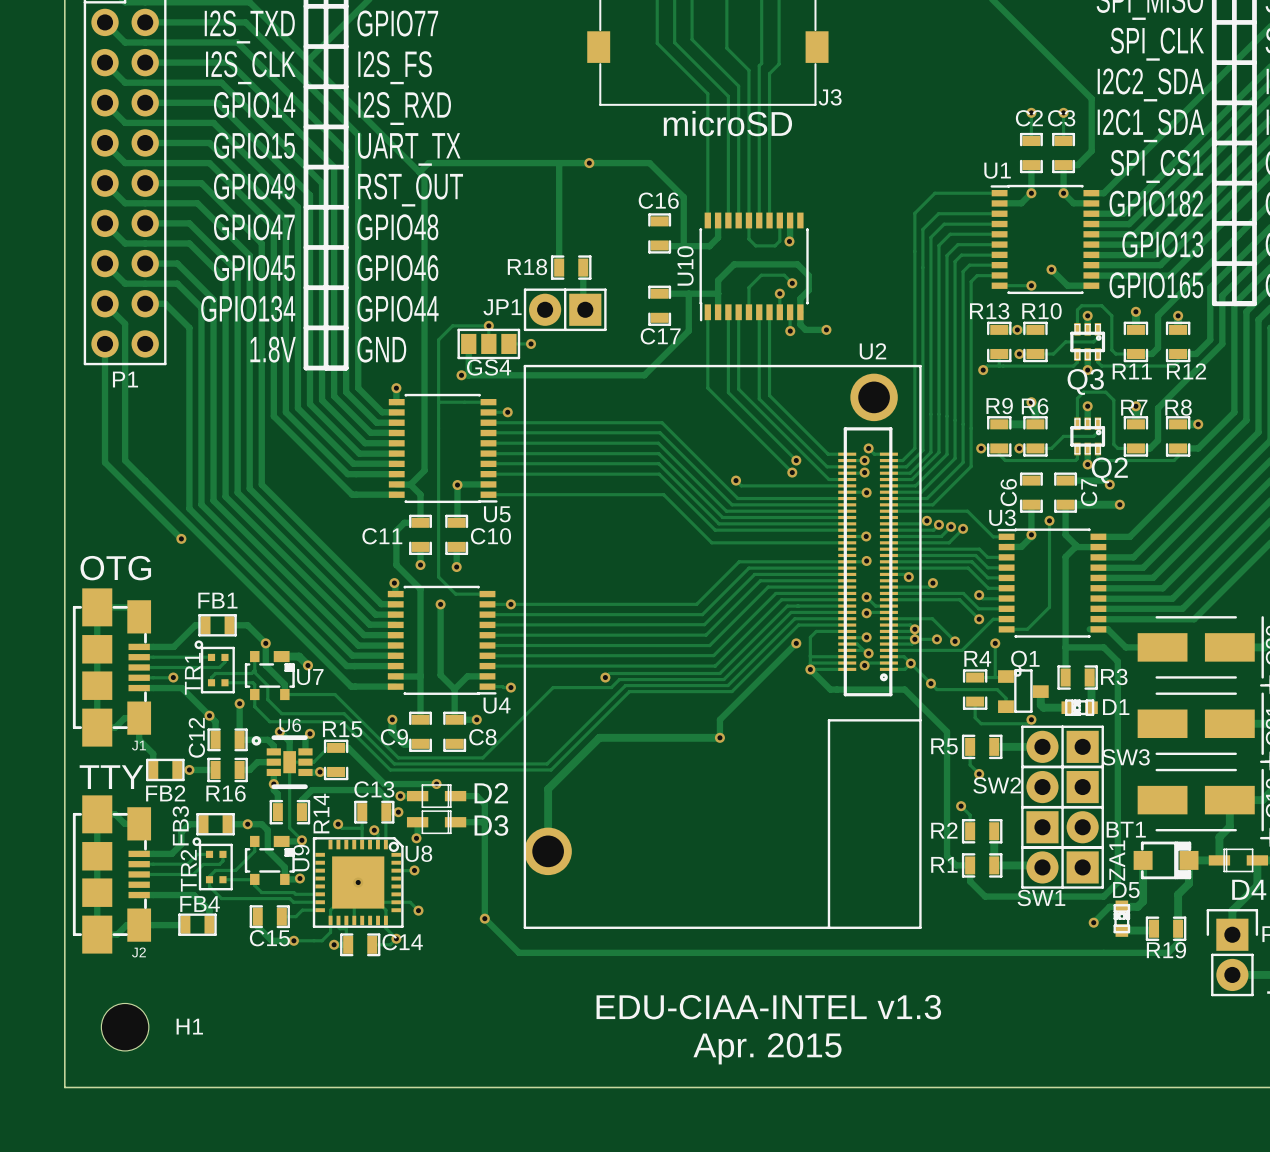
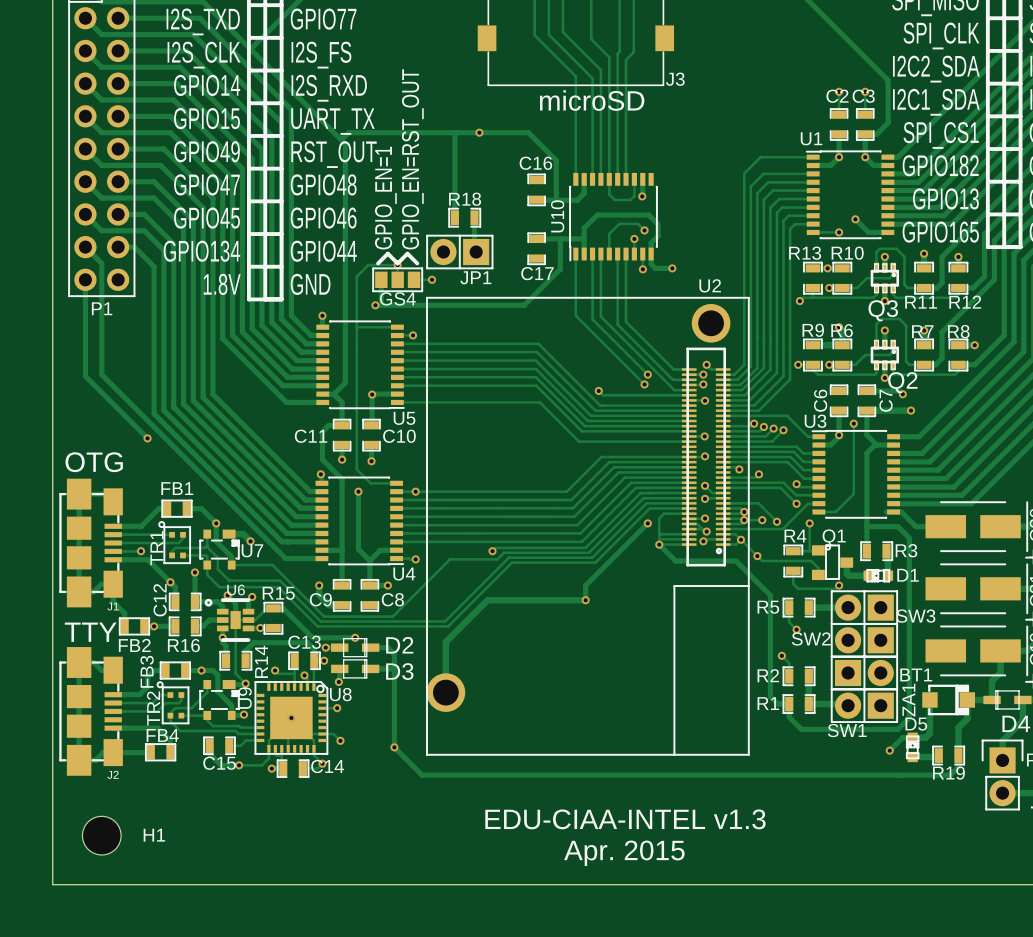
text: none -> GPIO_EN=RST_OUT (412, 159)
text: none -> GPIO_EN=1 (385, 198)
R18 name position: R18 (527, 266) -> R18 (465, 199)
JP1 name position: JP1 (502, 307) -> JP1 (475, 277)
line: none -> (378, 263) (387, 253) (397, 263) (407, 253) (417, 263)

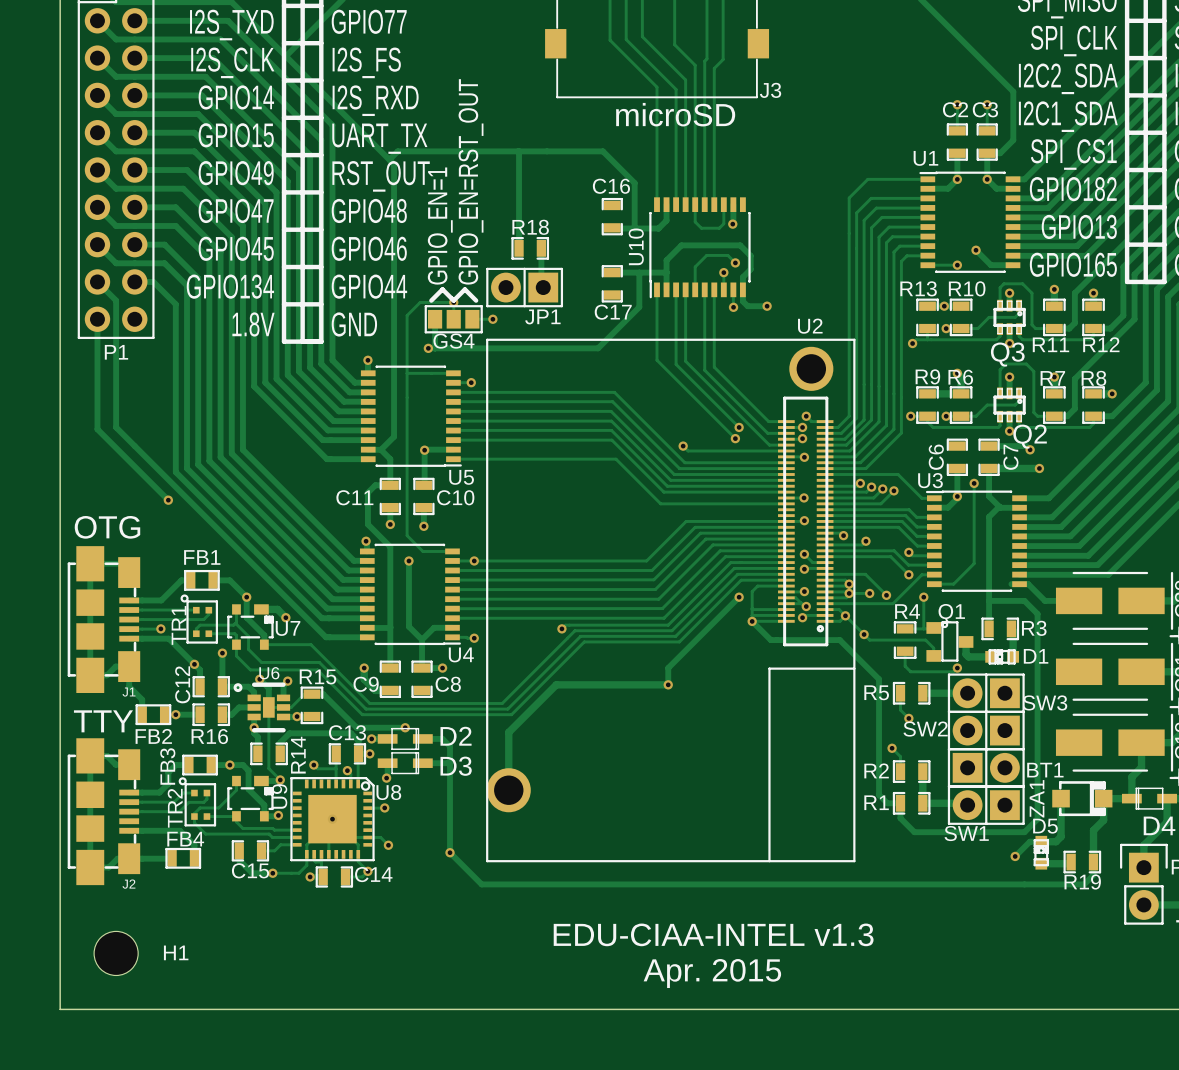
via: (479, 132) -> none
track: (497, 559) (450, 559) (392, 616) -> (567, 638) (502, 703) (448, 703)

